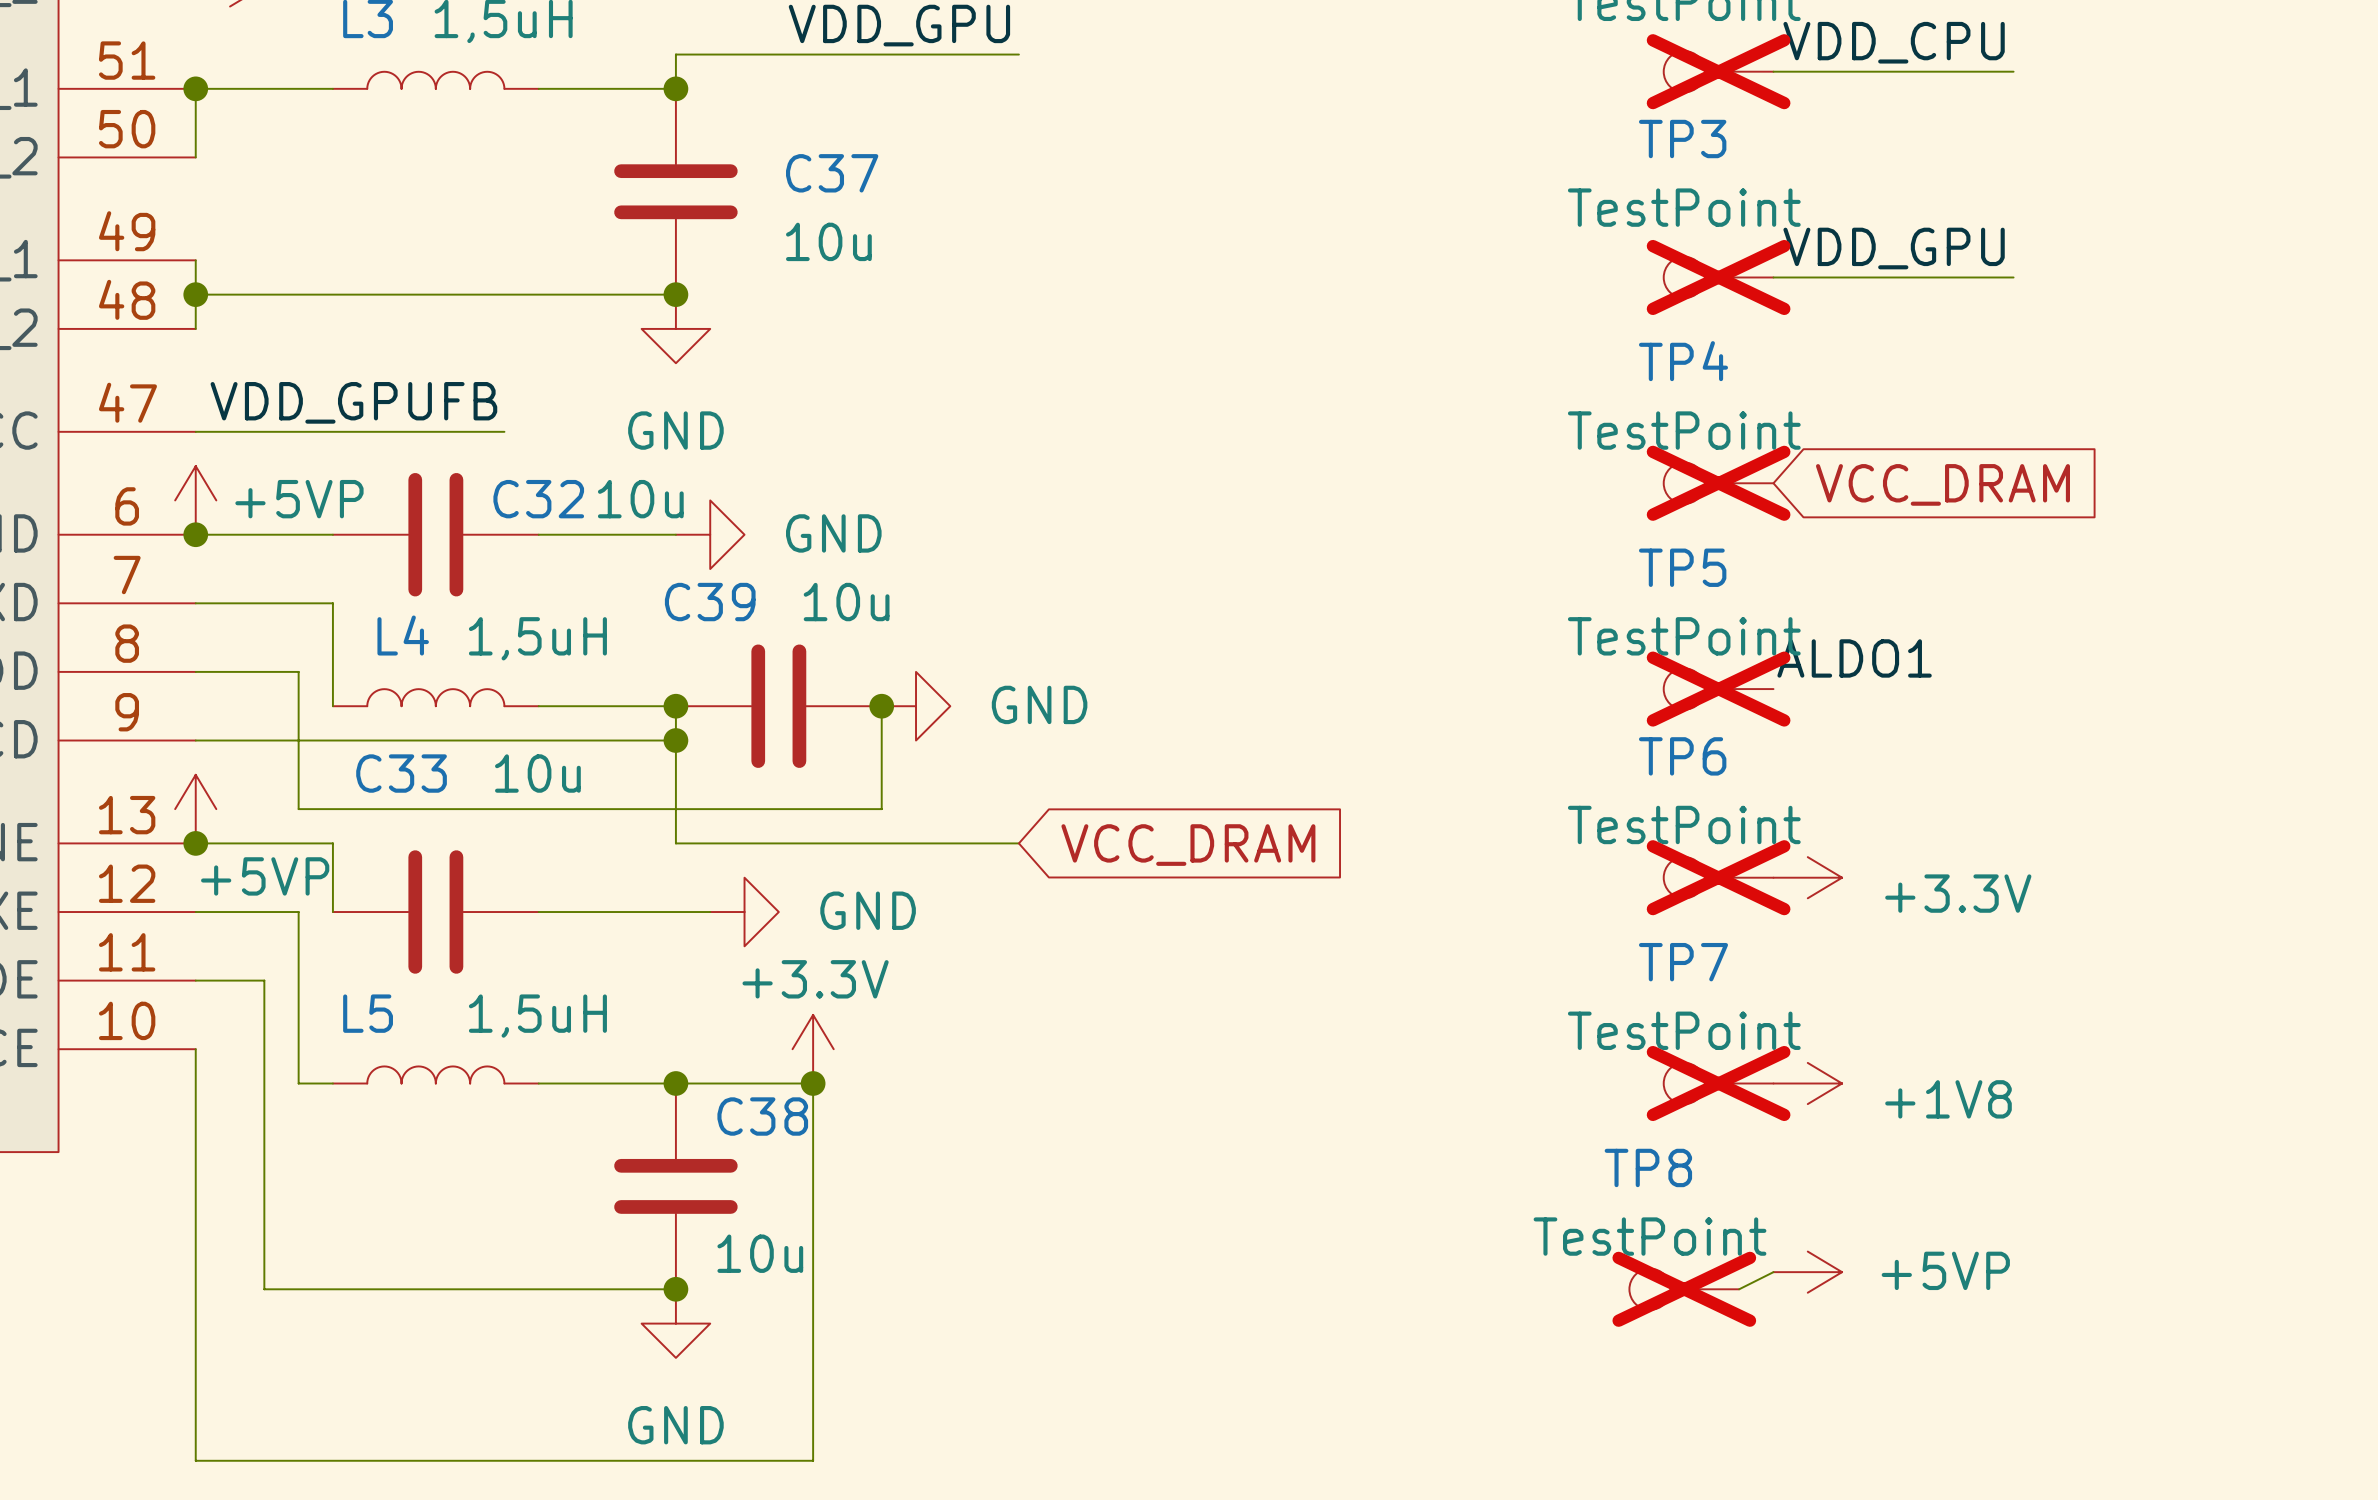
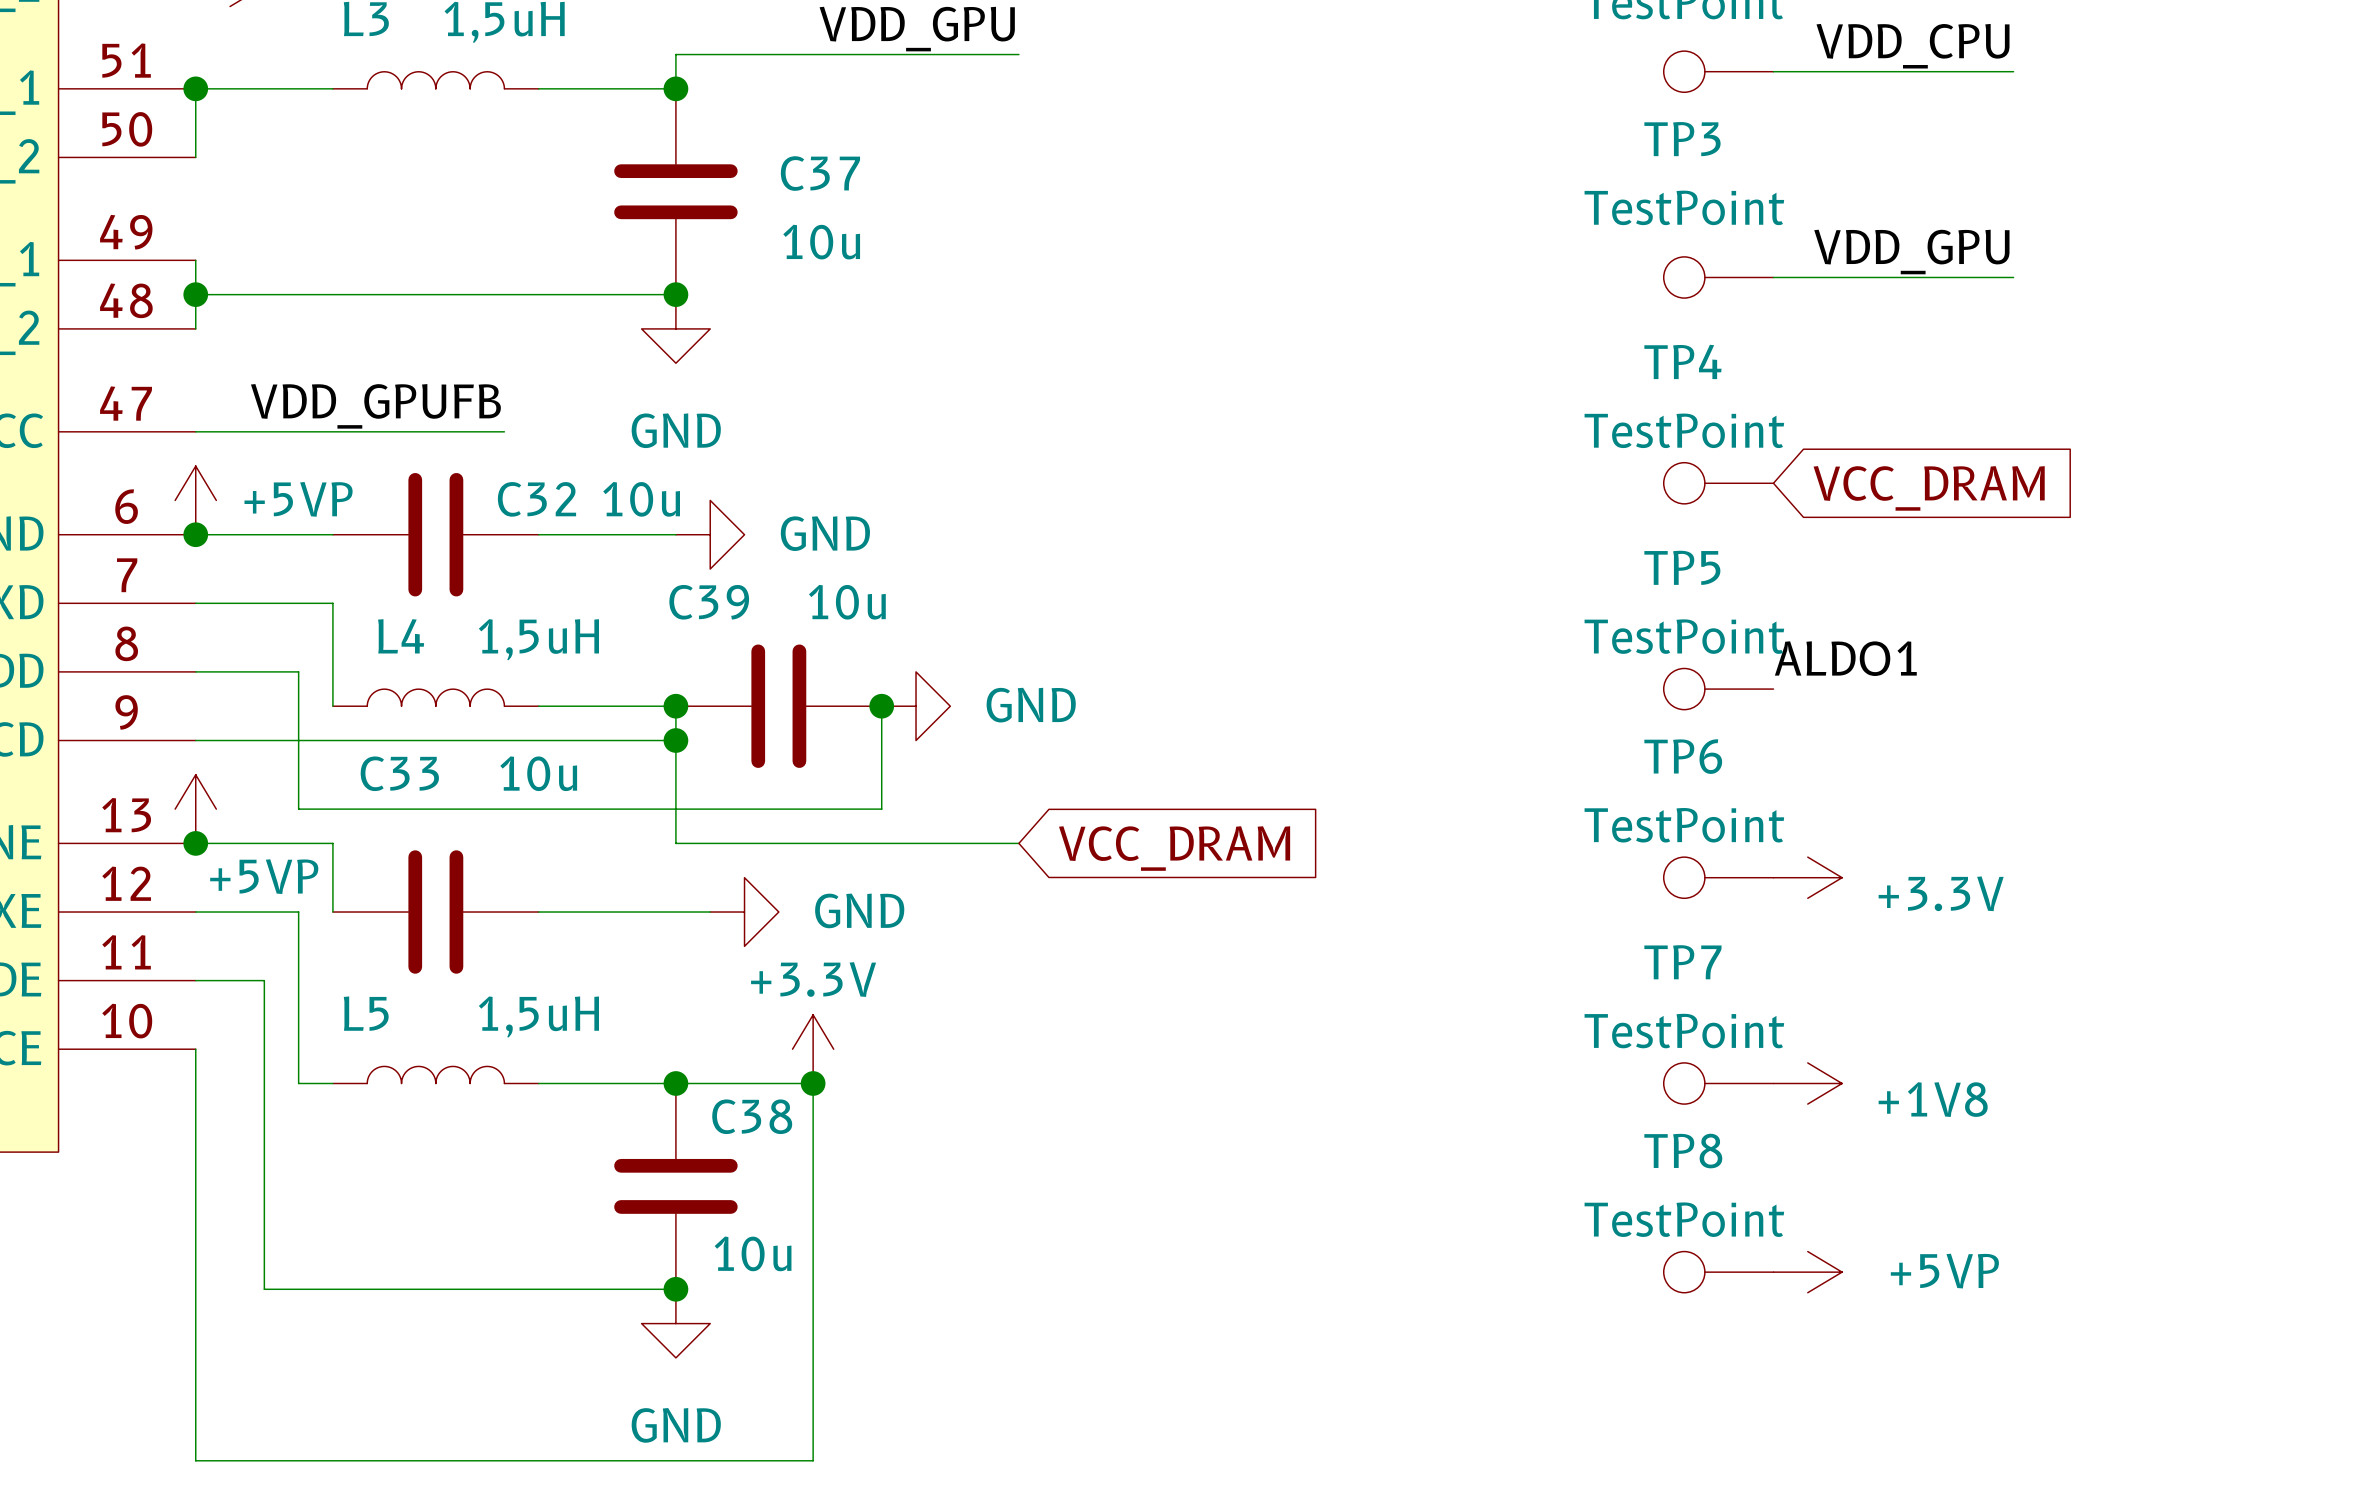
part do-not-place cross: (1718, 71) -> none
TP3 do-not-place cross: (1718, 277) -> none
TP4 do-not-place cross: (1718, 483) -> none
TP5 do-not-place cross: (1718, 689) -> none
TP6 do-not-place cross: (1718, 877) -> none
TP7 do-not-place cross: (1718, 1083) -> none
wire: (1773, 1272) (1739, 1289) -> none
TP8 position: (1684, 1289) -> (1718, 1272)
TP8 do-not-place cross: (1684, 1289) -> none

